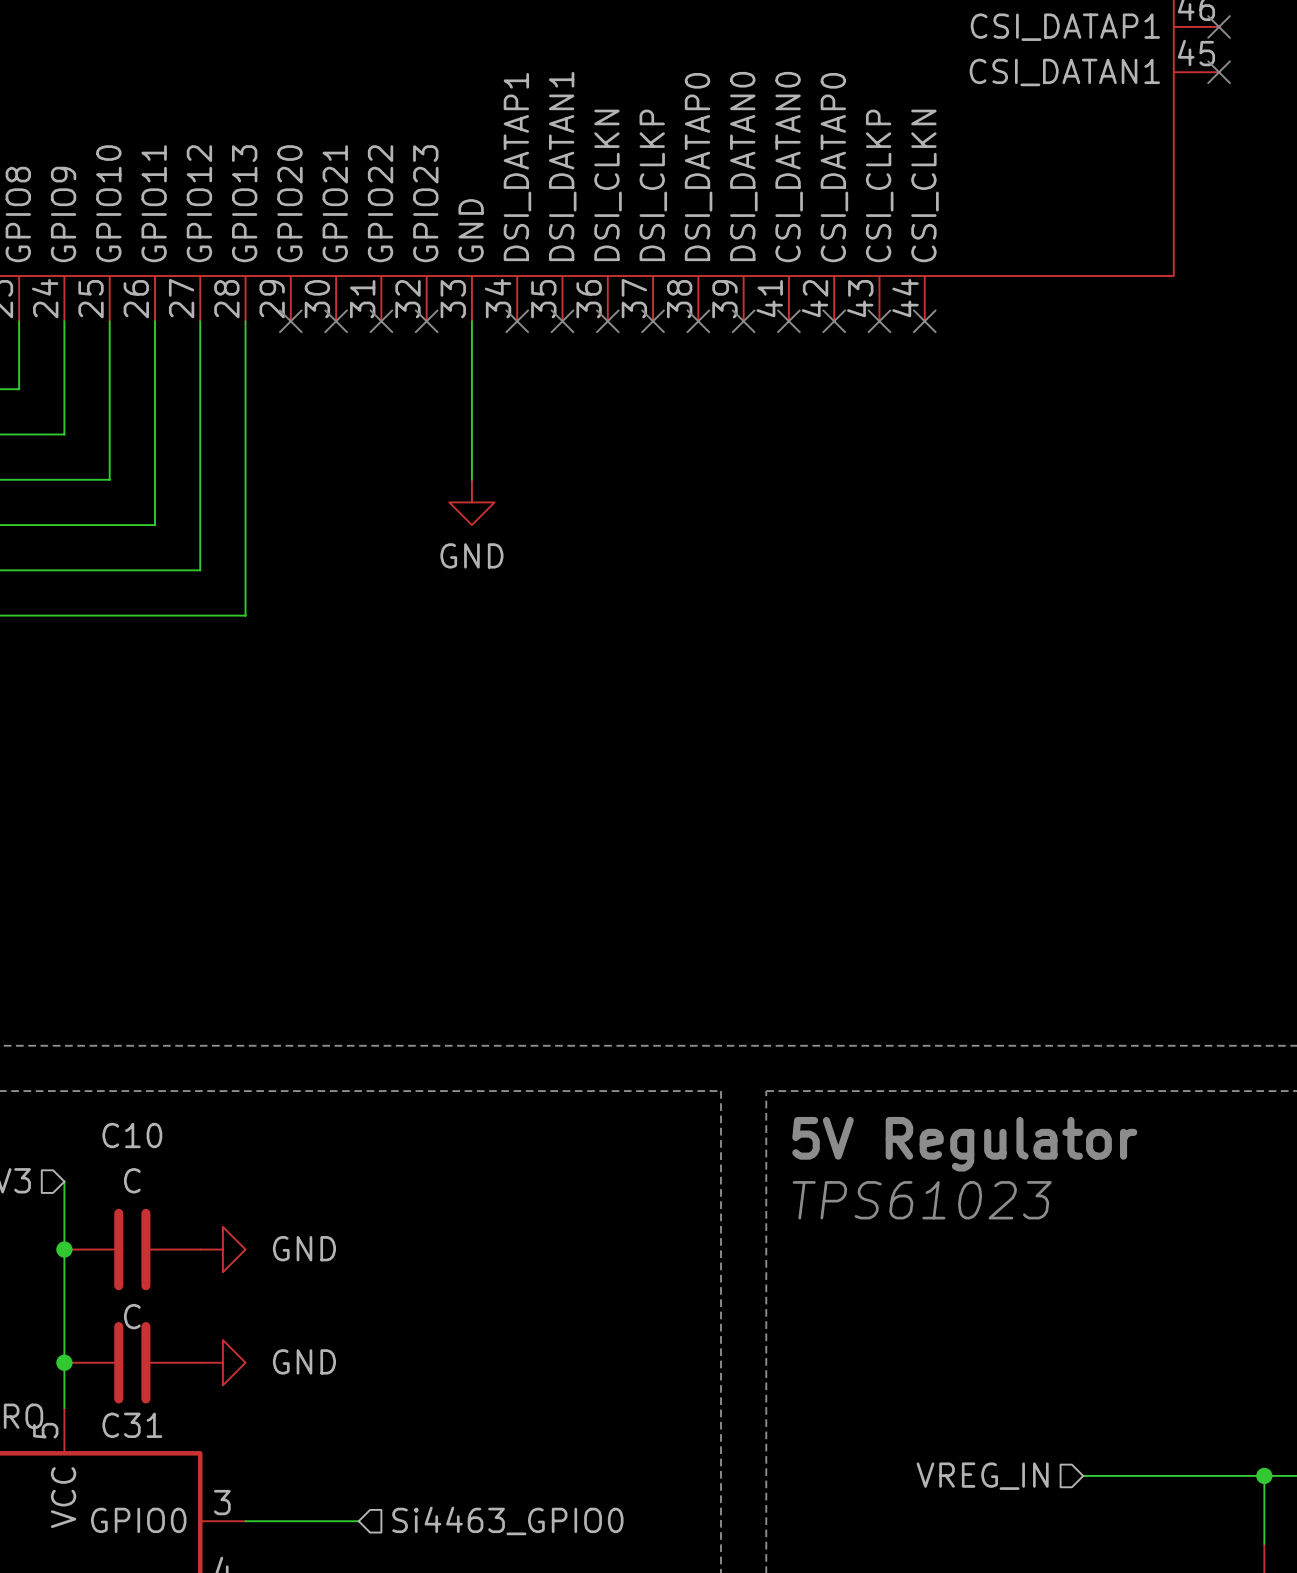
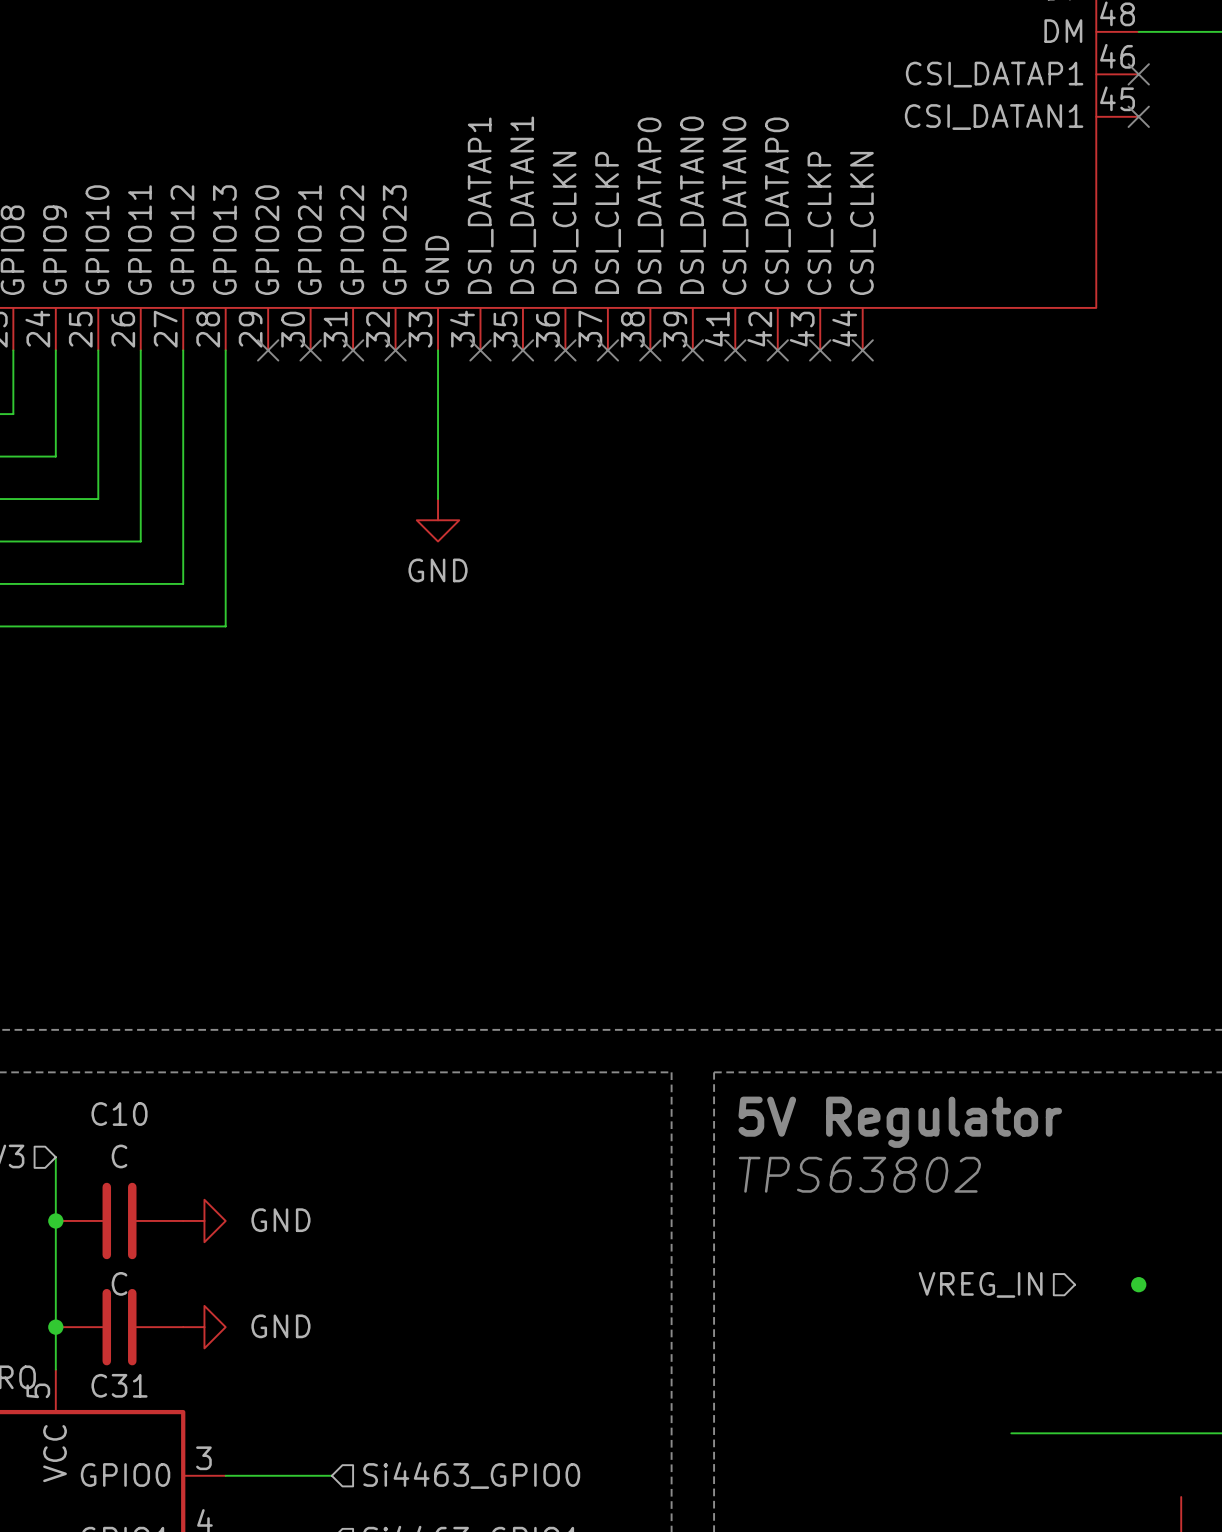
text: TPS61023 (922, 1200) -> TPS63802 (859, 1174)
junction: none -> (1138, 1284)
wire: (1264, 1475) (1264, 1543) -> none
junction: (1264, 1475) -> none
hierarchical label position: VREG_IN (982, 1476) -> VREG_IN (980, 1284)

